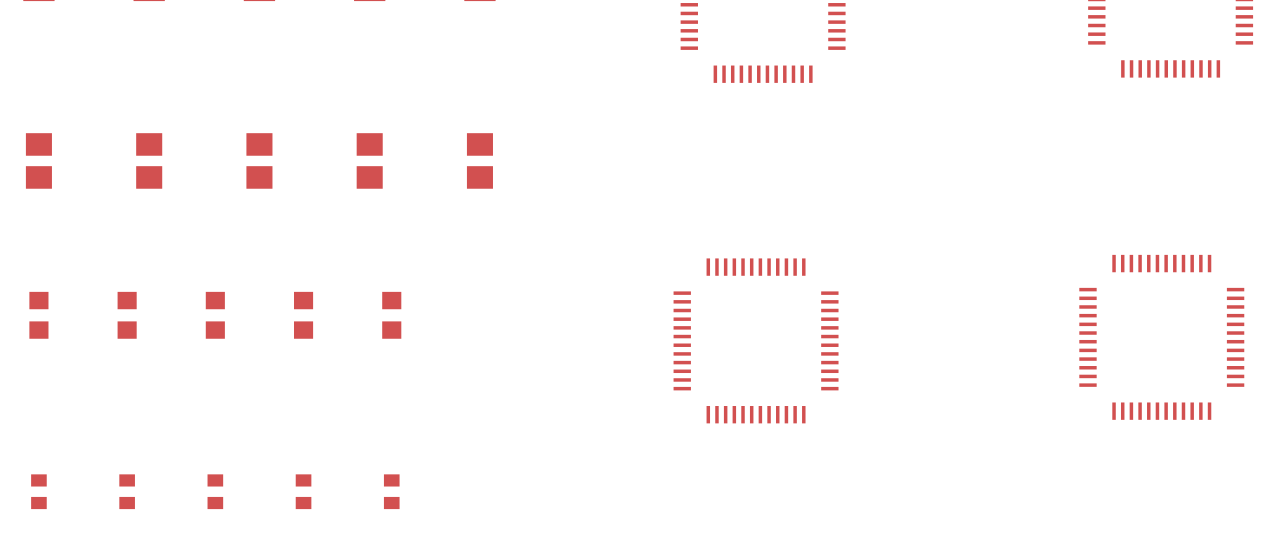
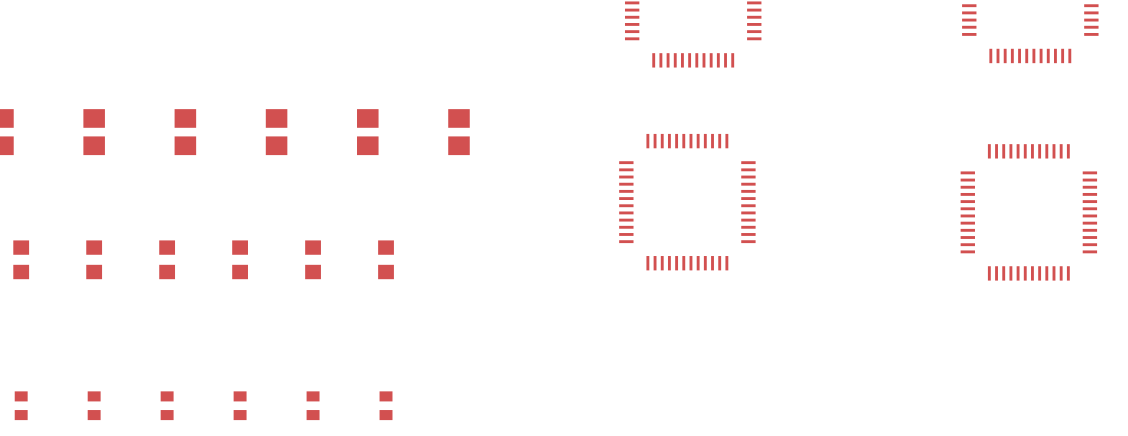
part position: (1161, 337) -> (1028, 212)
part position: (756, 340) -> (687, 202)

